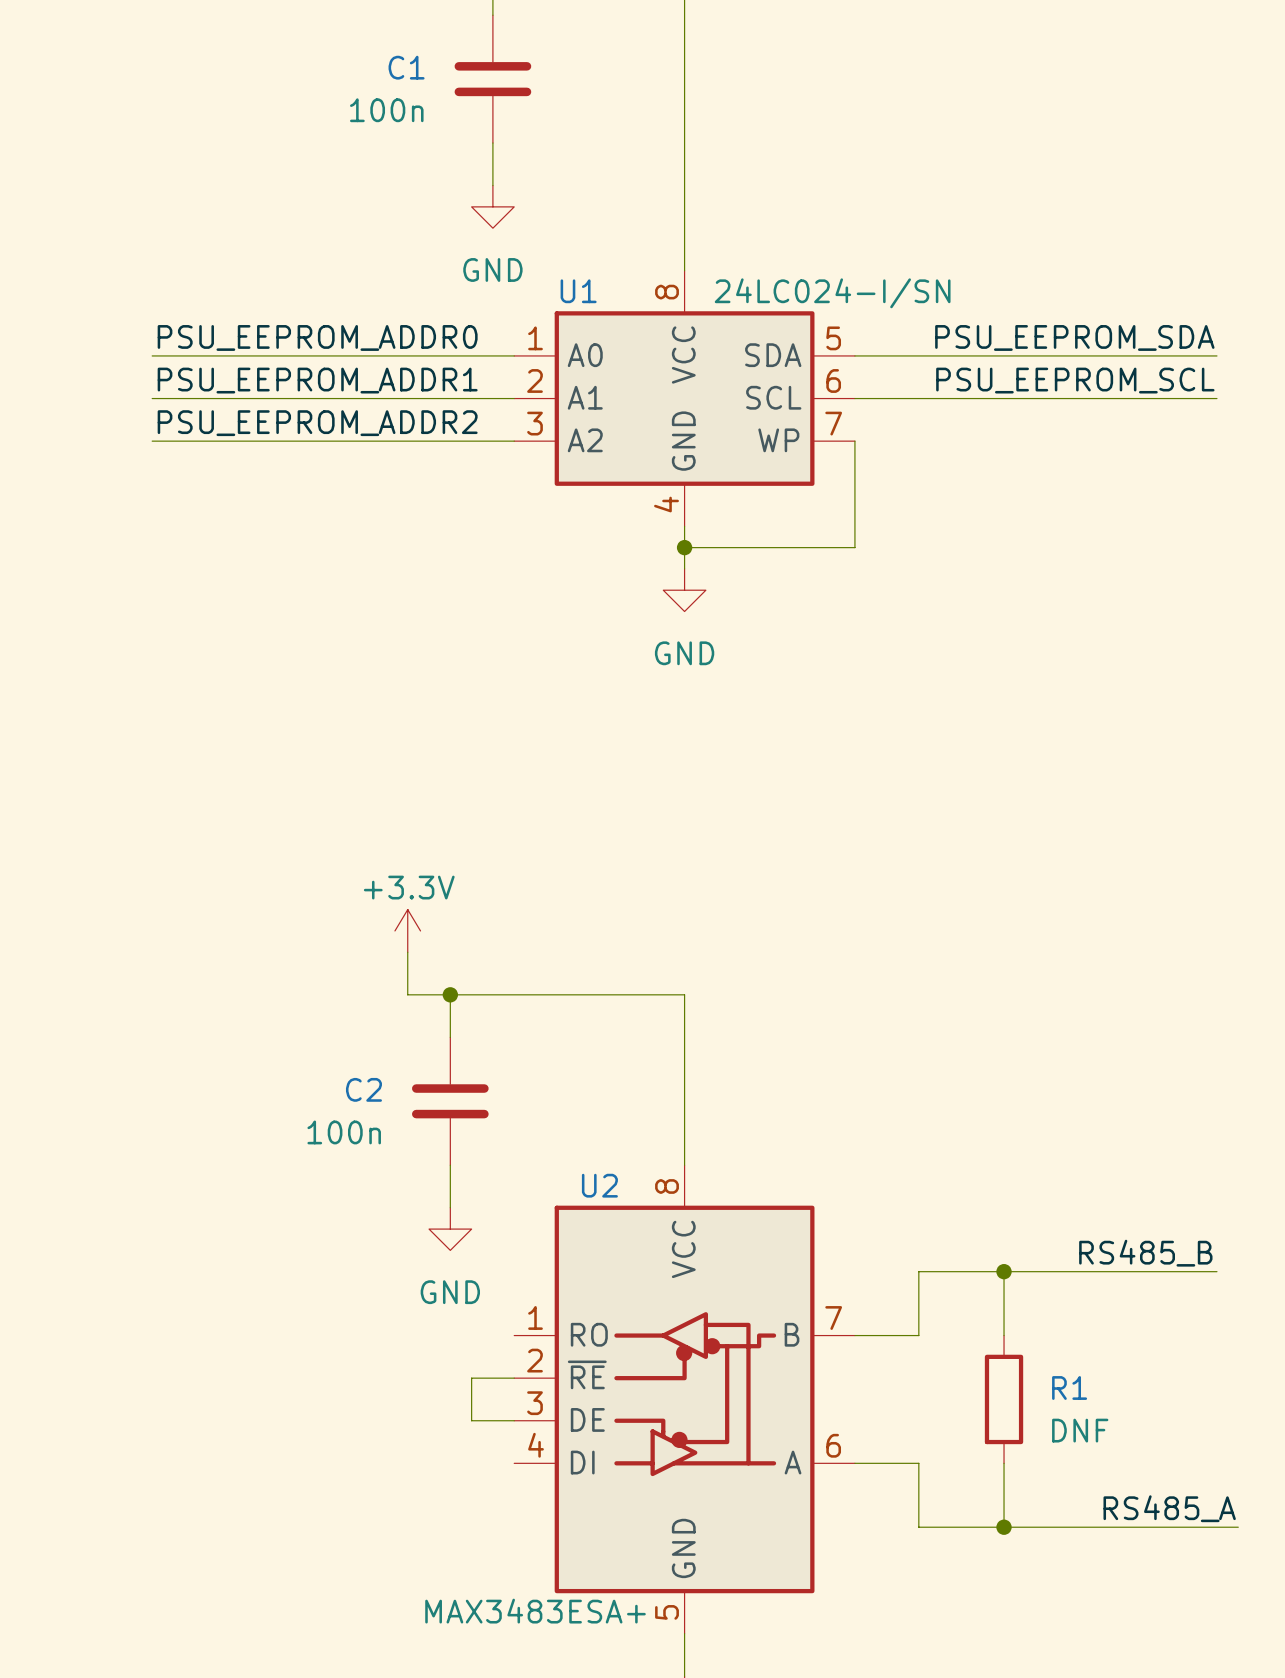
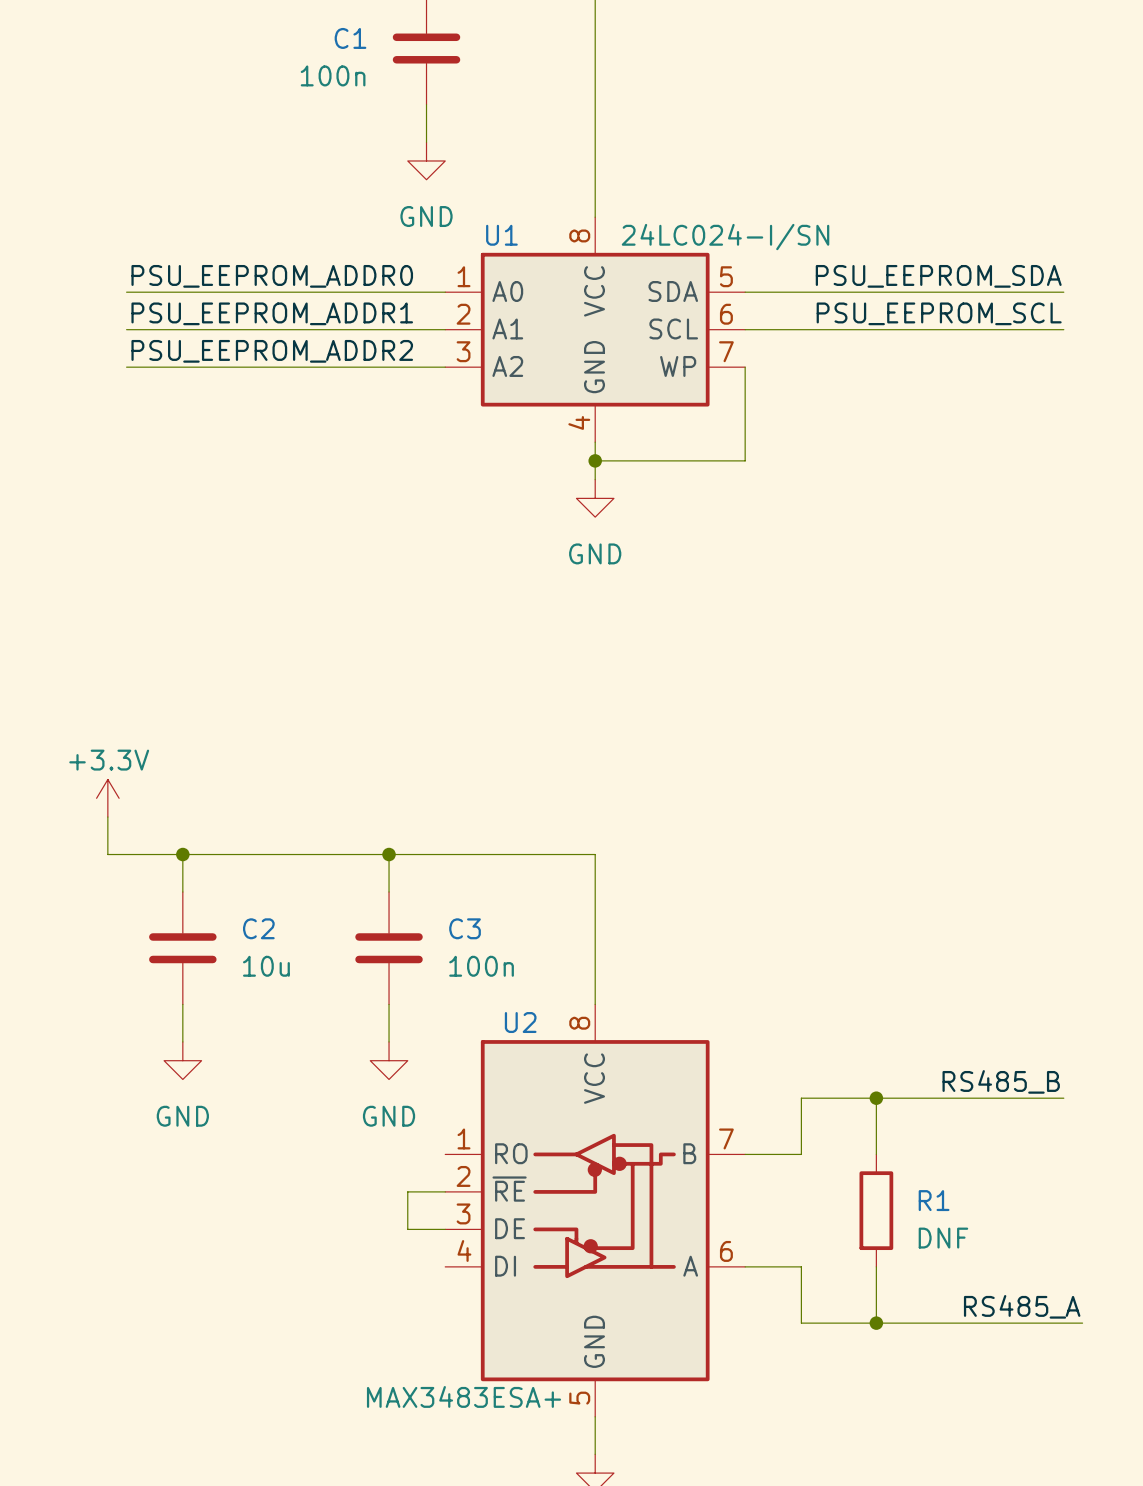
power symbol position: +3.3V (407, 930) -> +3.3V (107, 798)
wire: (407, 952) (407, 994) -> (107, 817) (107, 854) (351, 854)
wire: none -> (182, 854) (182, 892)
junction: none -> (182, 854)
C2 name: C2 (363, 1089) -> C3 (465, 928)
C2: none -> 10u (182, 948)
C2 value position: 100n (344, 1132) -> 100n (481, 966)
wire: none -> (182, 1004) (182, 1041)
power symbol: none -> GND (182, 1060)

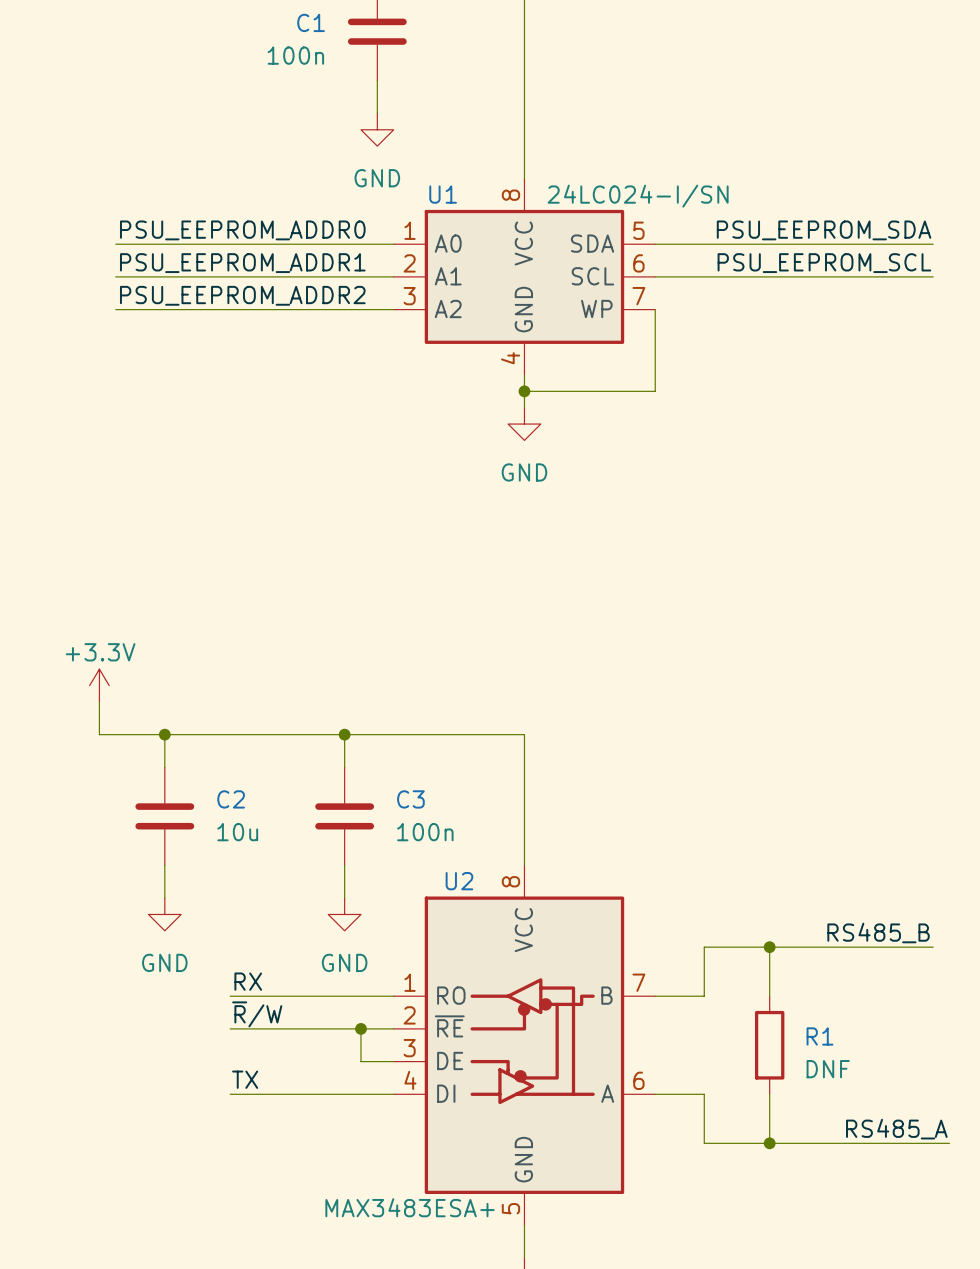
label: none -> RX (248, 981)
wire: none -> (230, 996) (393, 996)
label: none -> ~{R}/W (257, 1014)
wire: none -> (230, 1028) (360, 1028)
junction: none -> (360, 1028)
label: none -> TX (245, 1079)
wire: none -> (230, 1094) (393, 1094)

